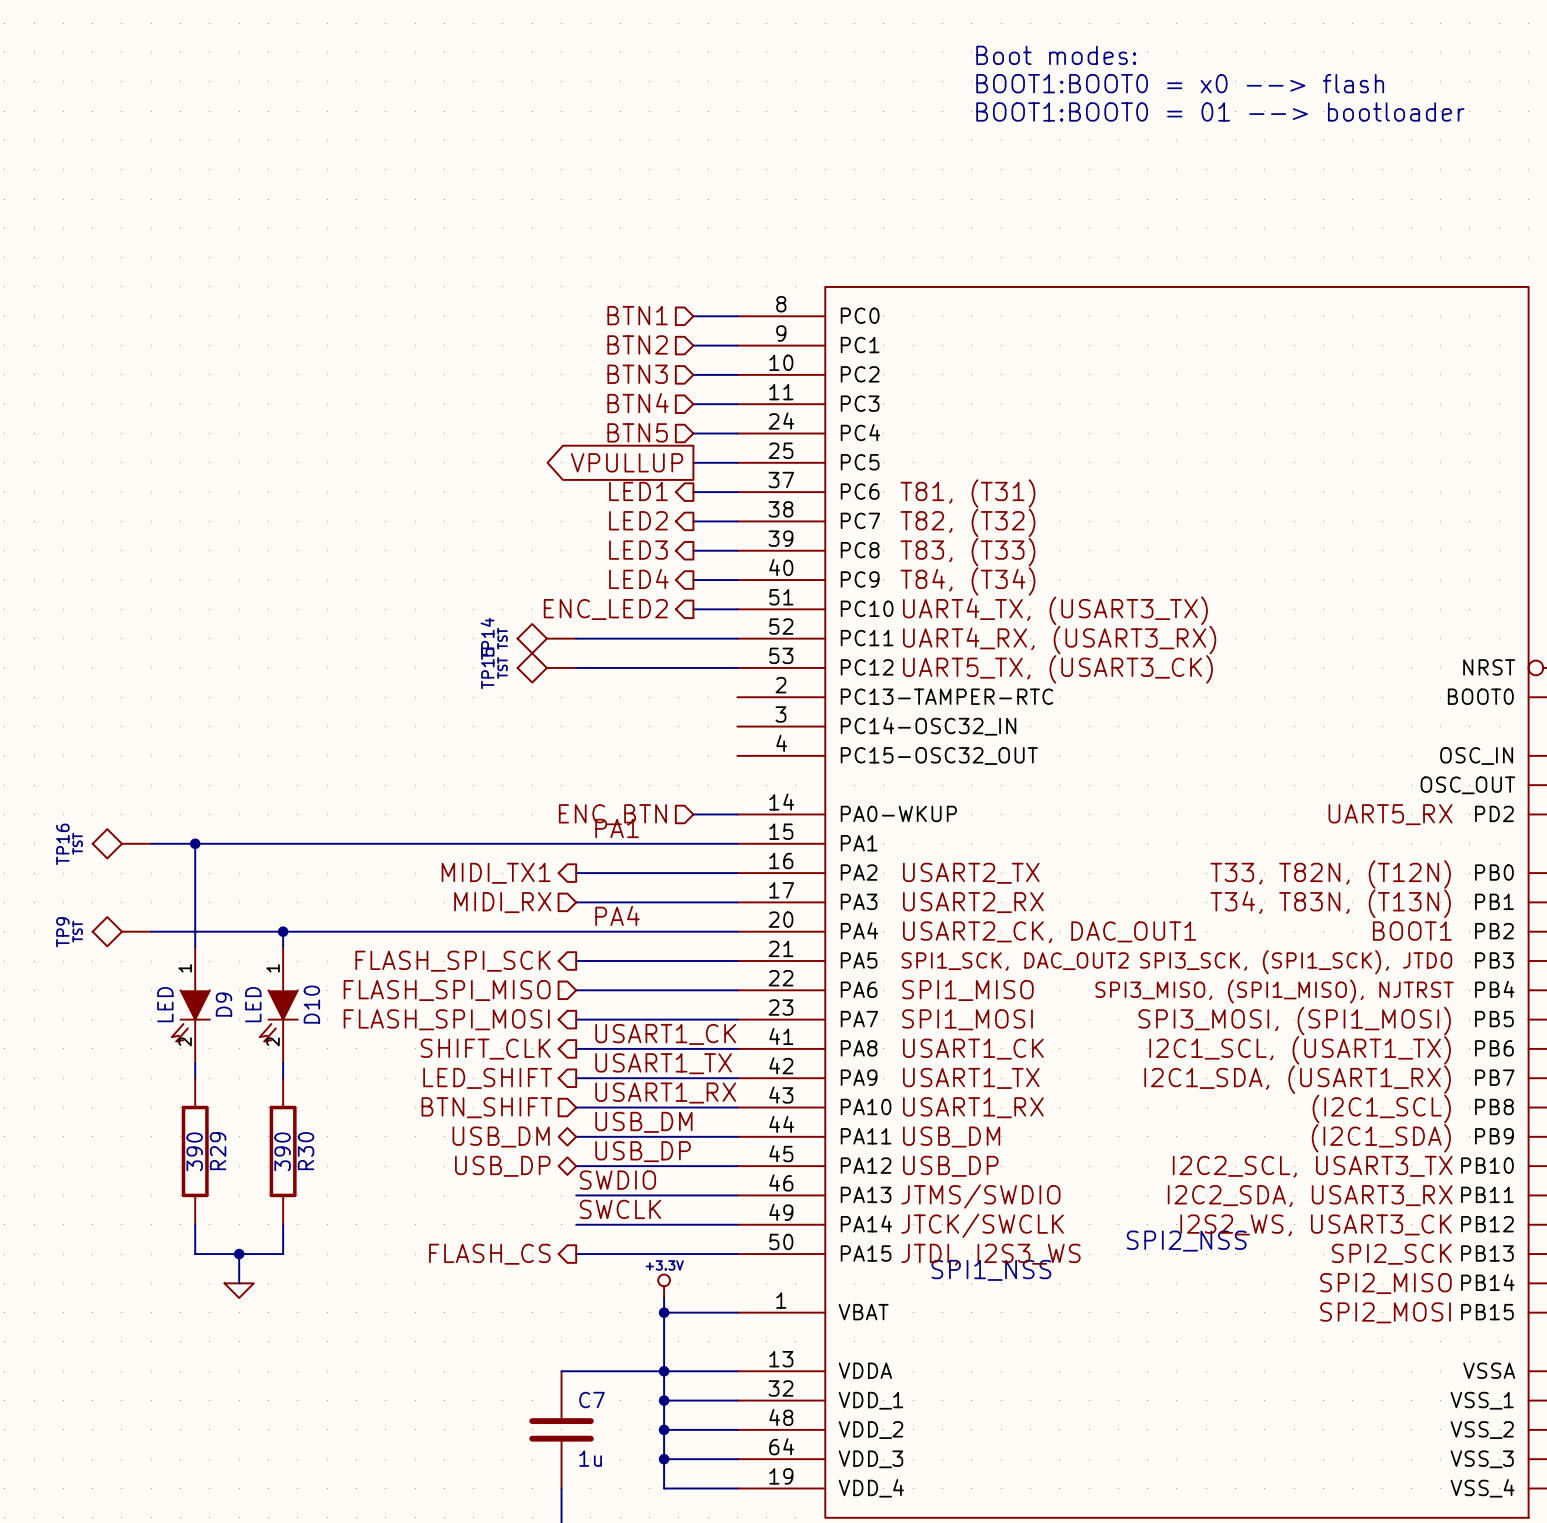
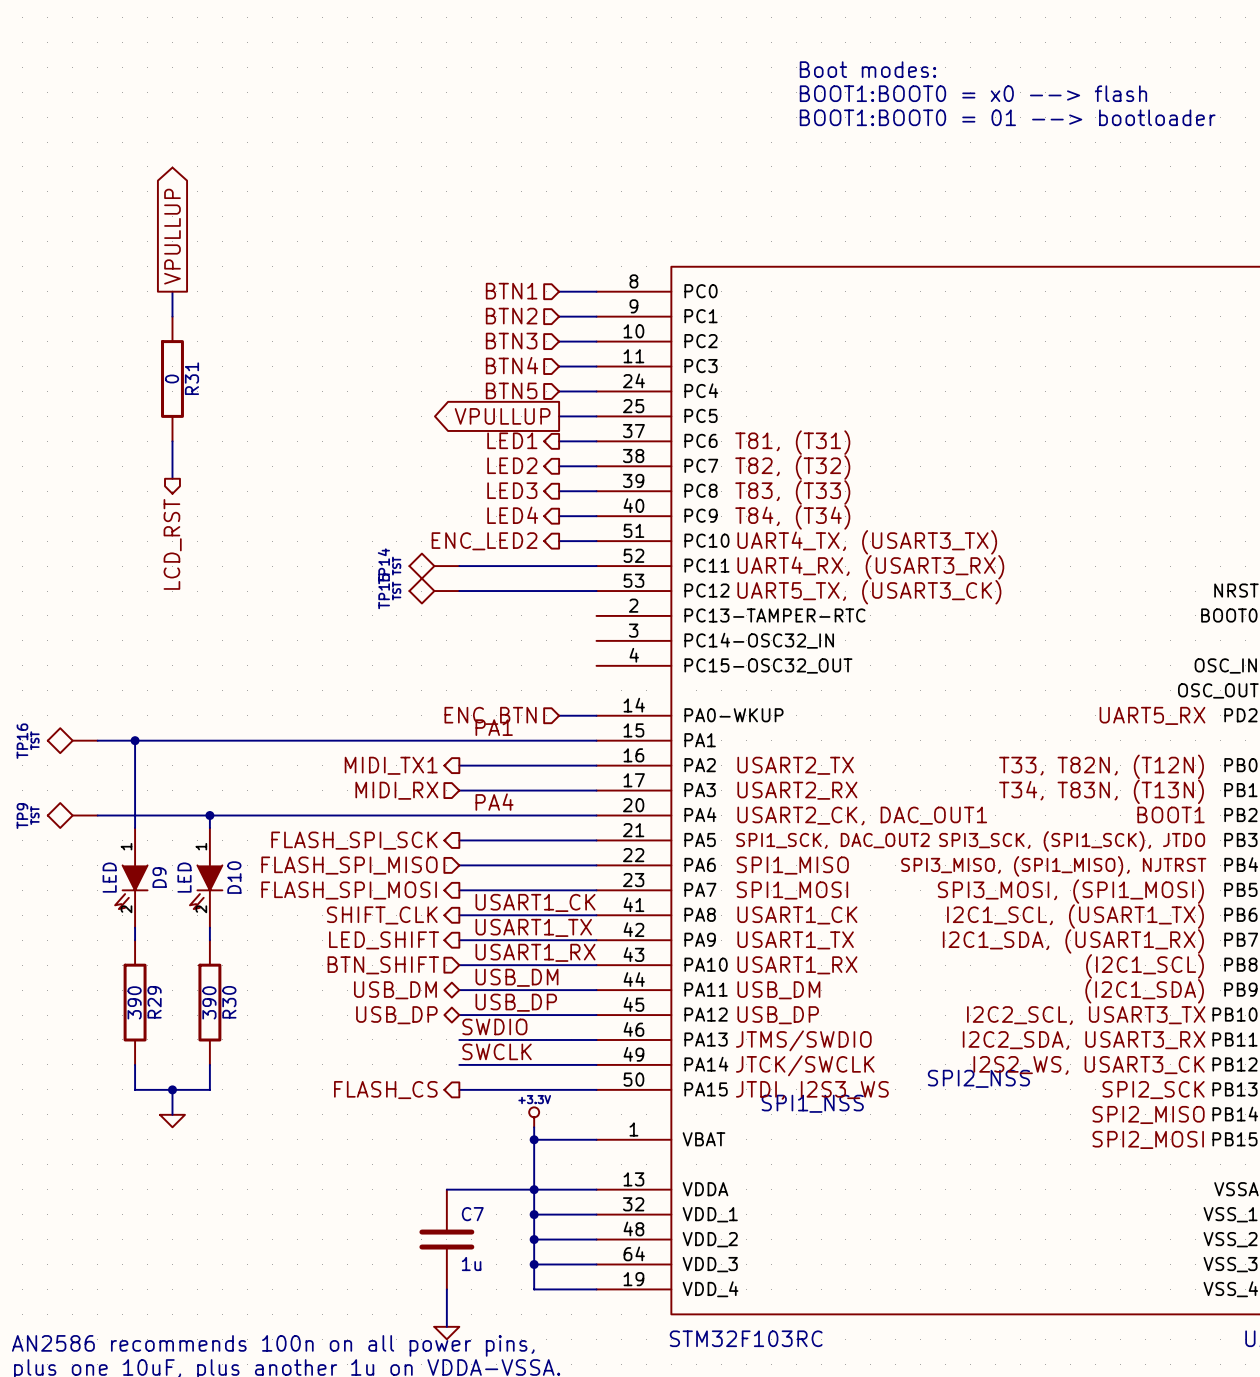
global label: none -> VPULLUP (172, 236)
wire: none -> (172, 291) (172, 316)
R31: none -> 0 (172, 379)
wire: none -> (172, 441) (172, 478)
hierarchical label: none -> LCD_RST (172, 544)

